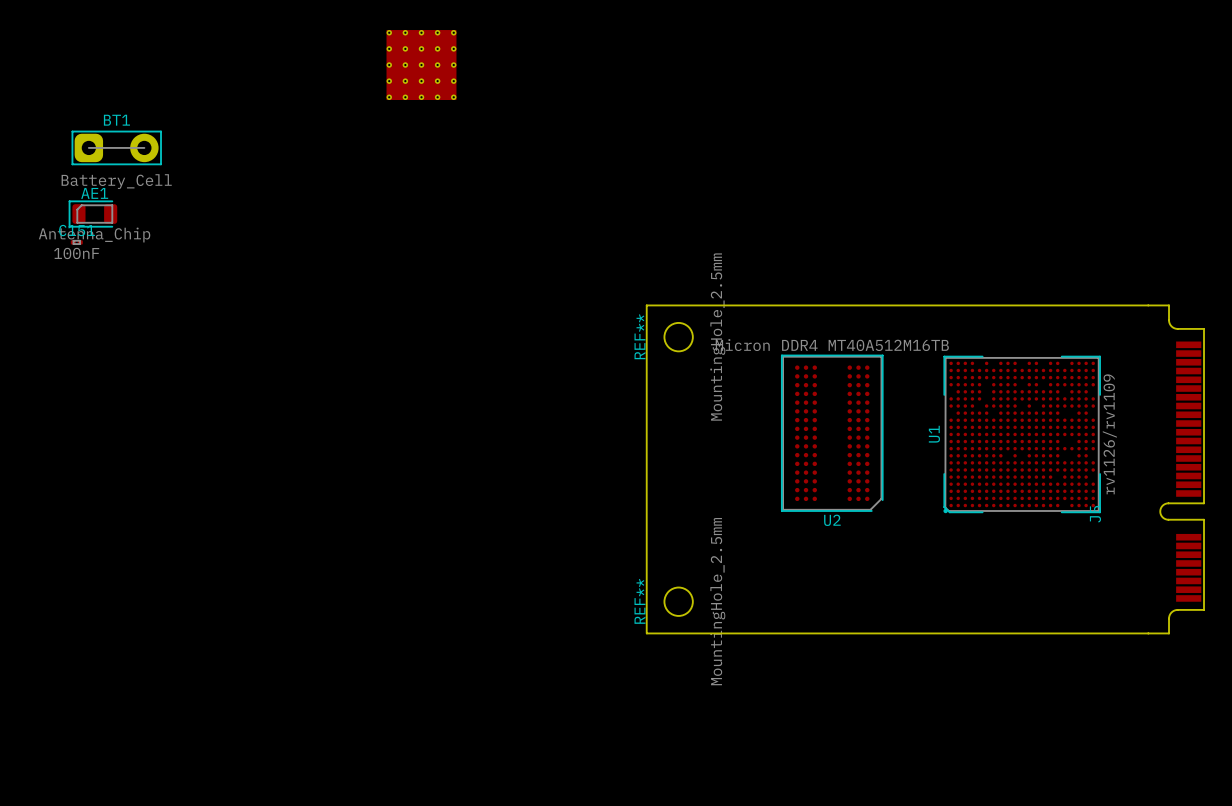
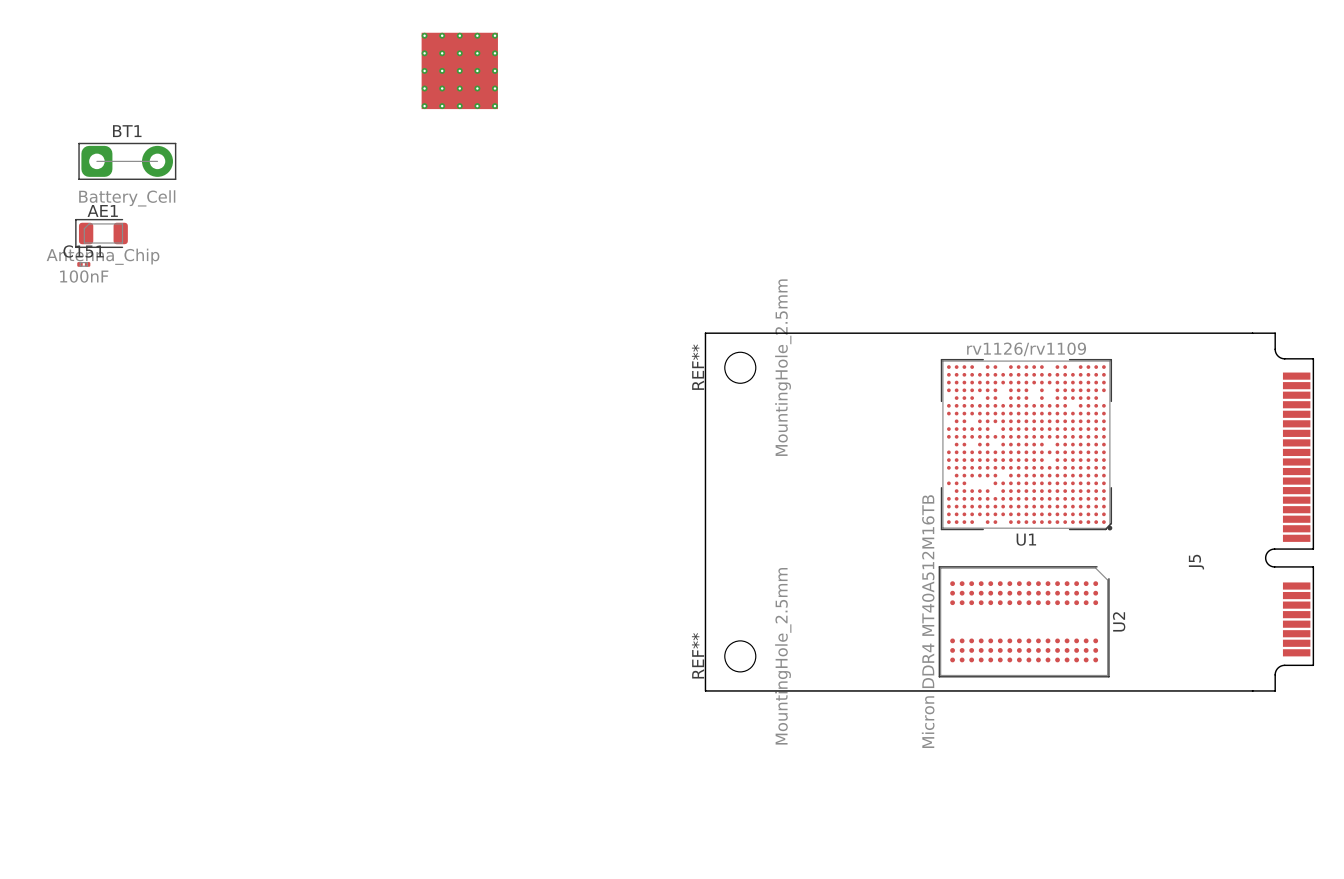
U2 rotation: 0° (832, 433) -> 90° counterclockwise (1024, 621)
U2 position: (832, 433) -> (1024, 621)
U1 rotation: 0° (1022, 434) -> 90° counterclockwise (1026, 444)

